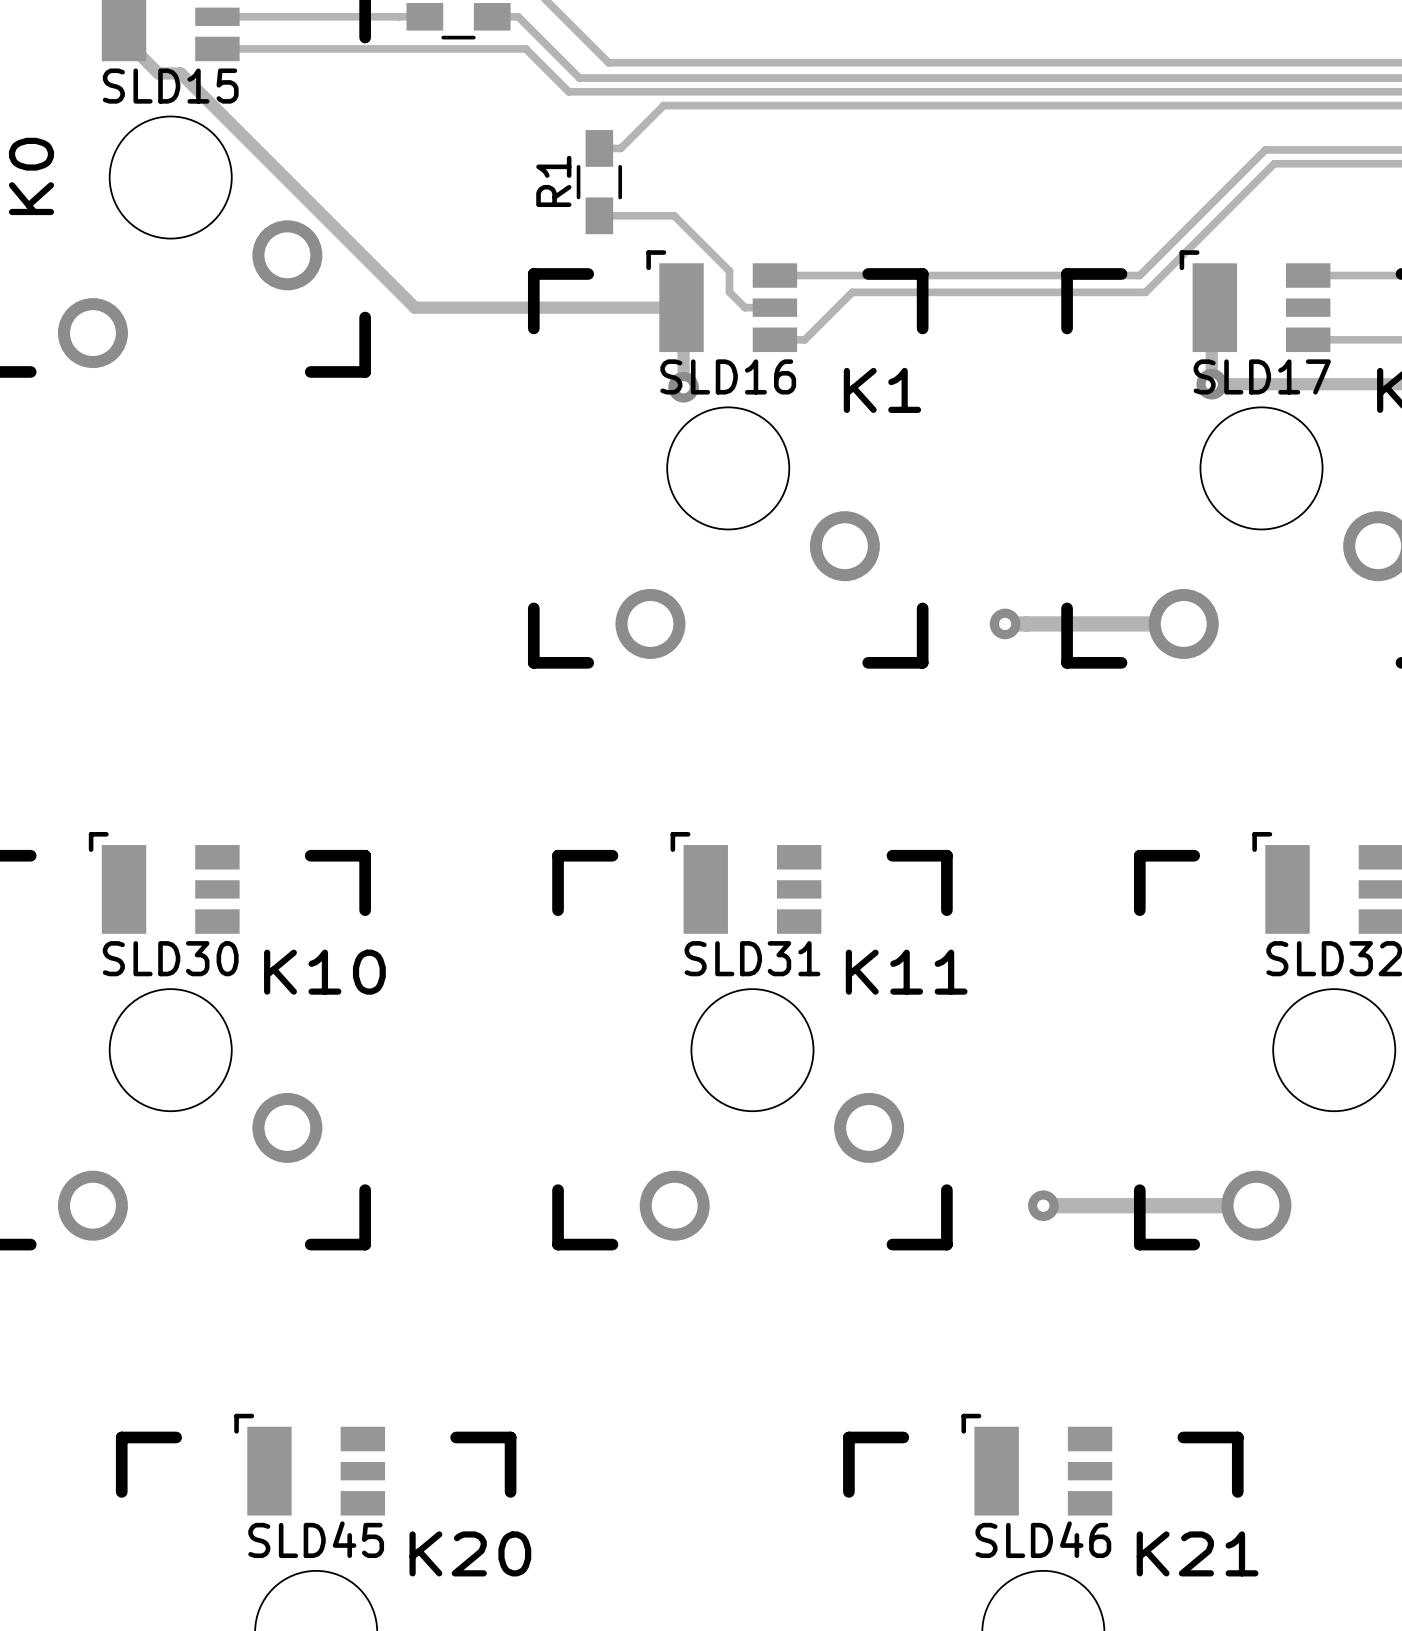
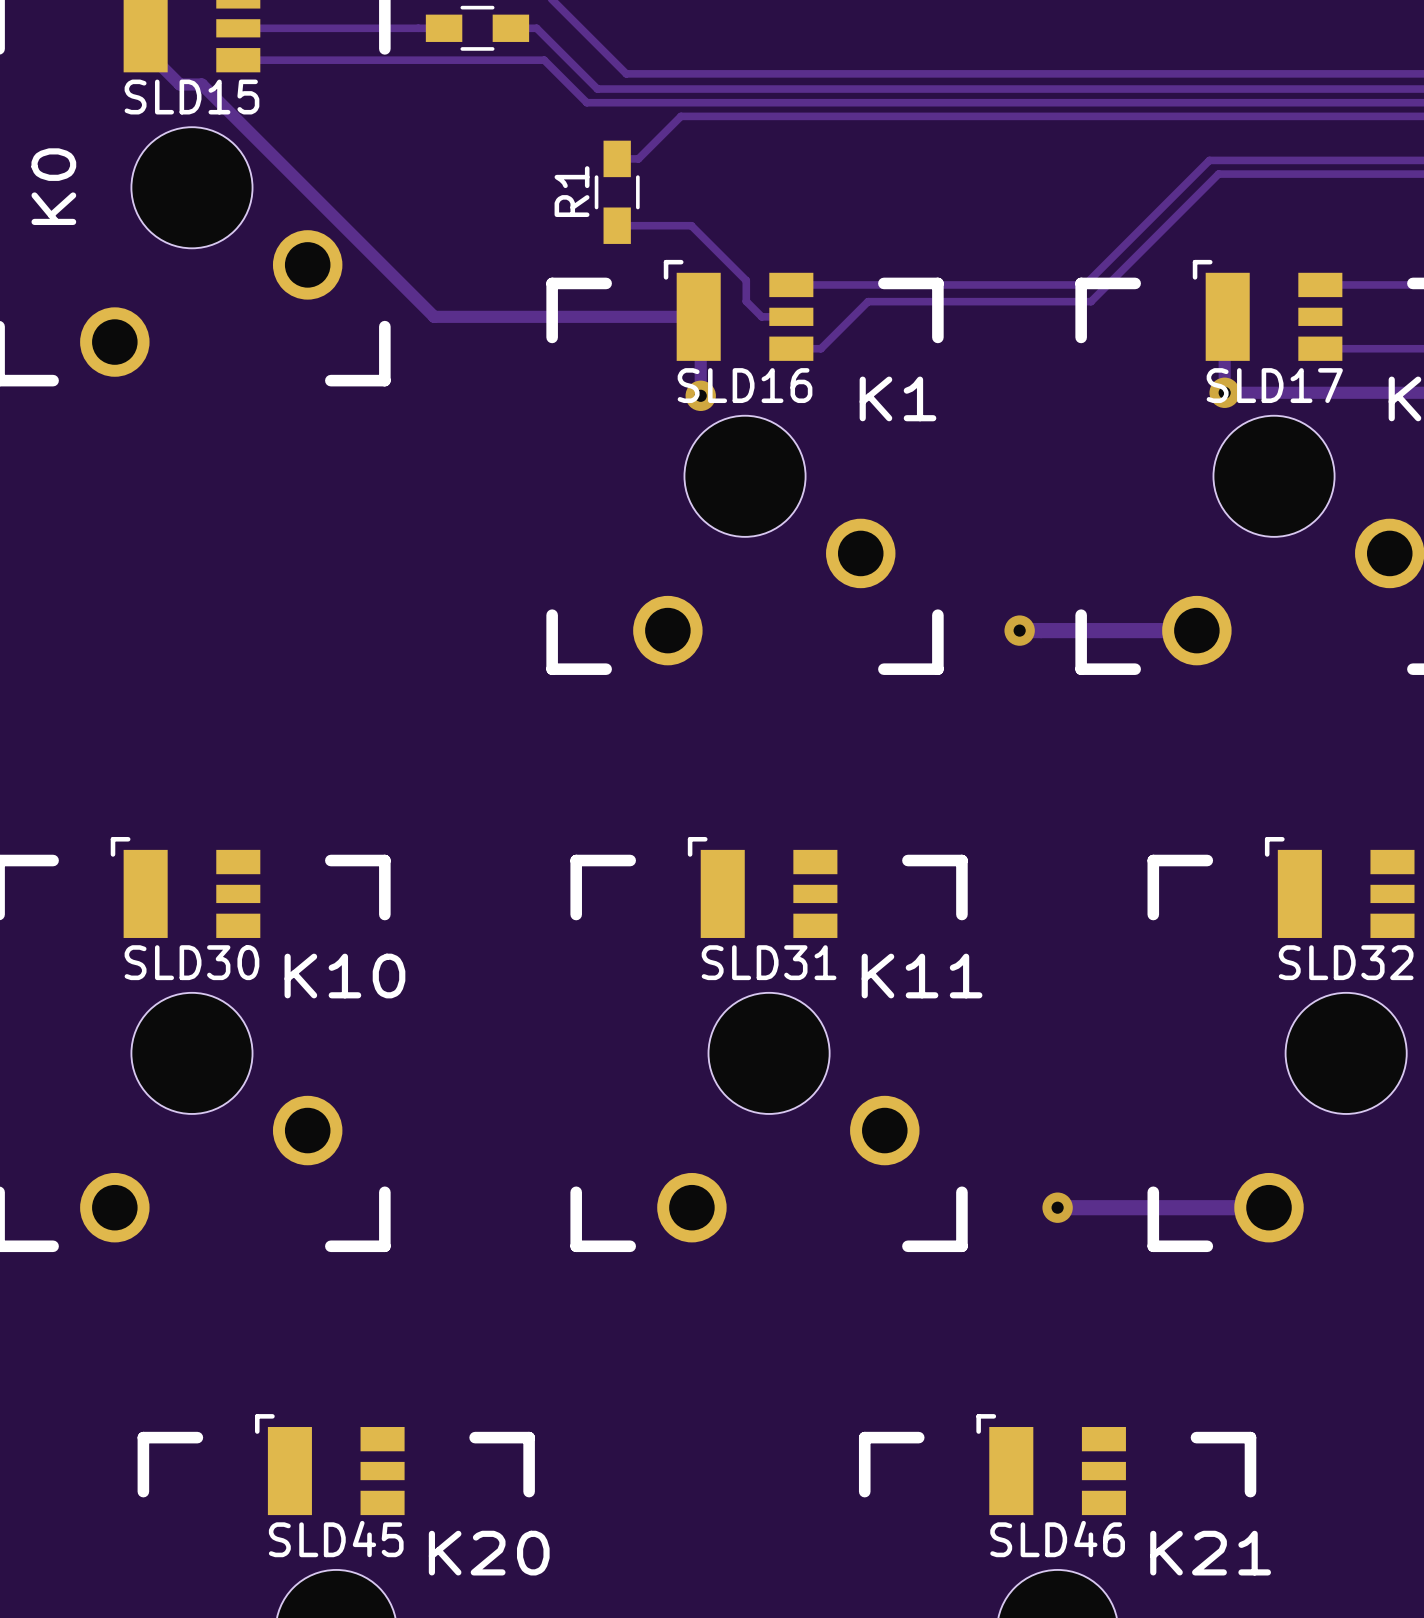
track: (1265, 149) (1139, 275) (1070, 275) -> (1277, 160) (1209, 160) (1084, 284)
track: (1274, 163) (1145, 292) (1077, 292) -> (1286, 174) (1218, 174) (1091, 301)

